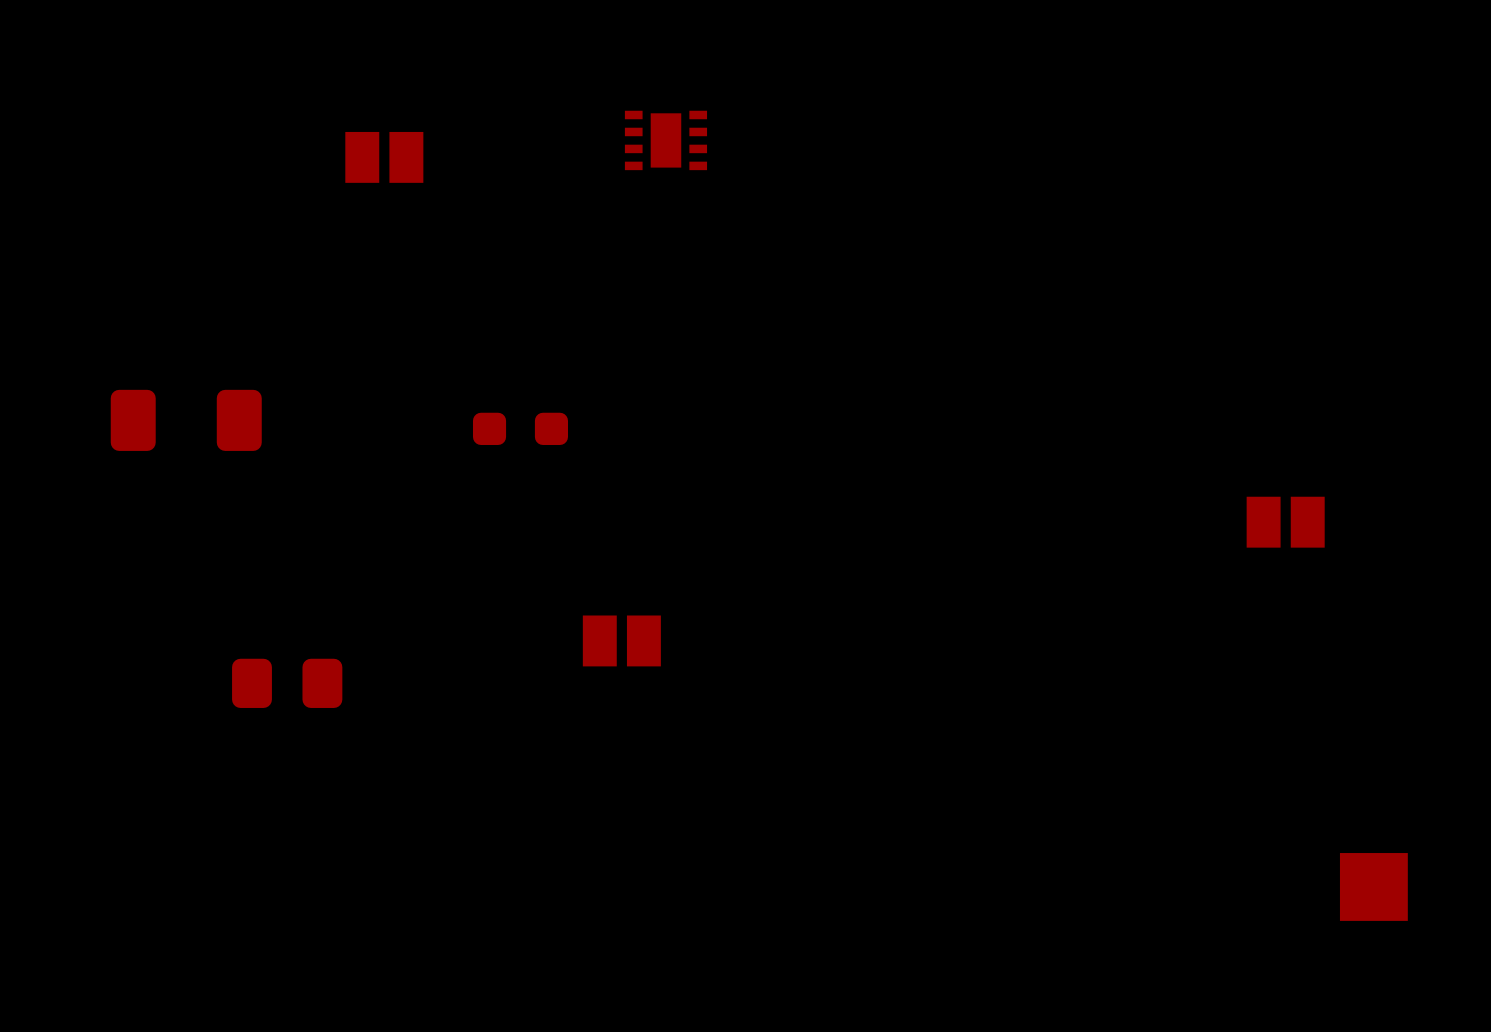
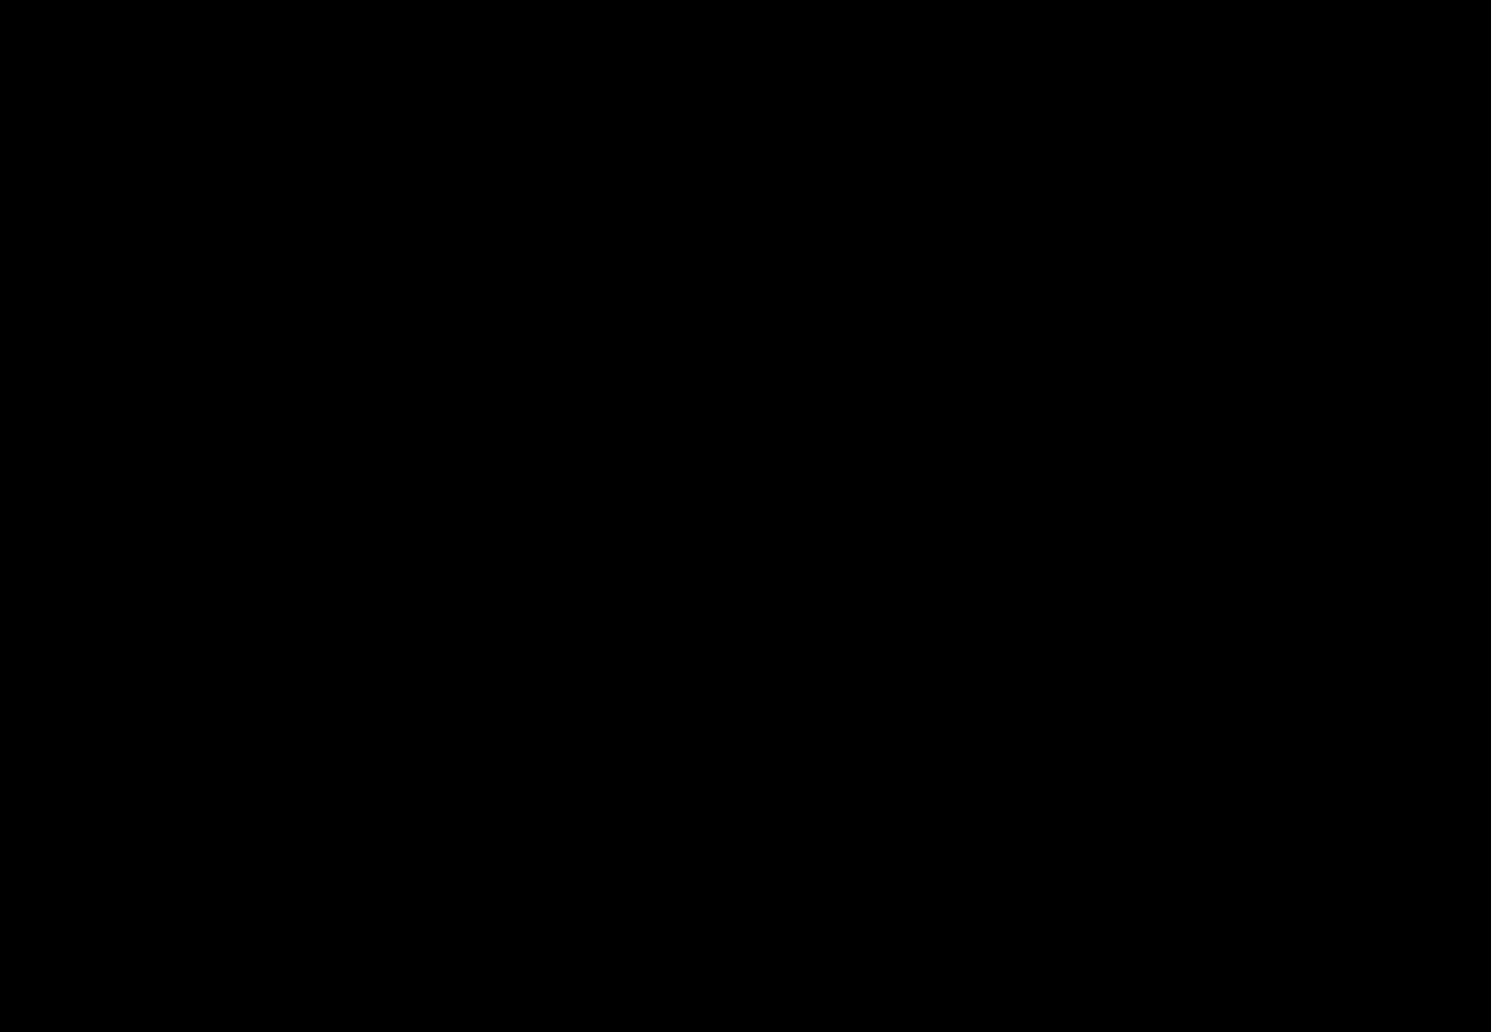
part: (665, 140) -> none
part: (384, 157) -> none
part: (186, 420) -> none
part: (520, 428) -> none
part: (1285, 522) -> none
part: (621, 640) -> none
part: (287, 683) -> none
part: (1373, 886) -> none

